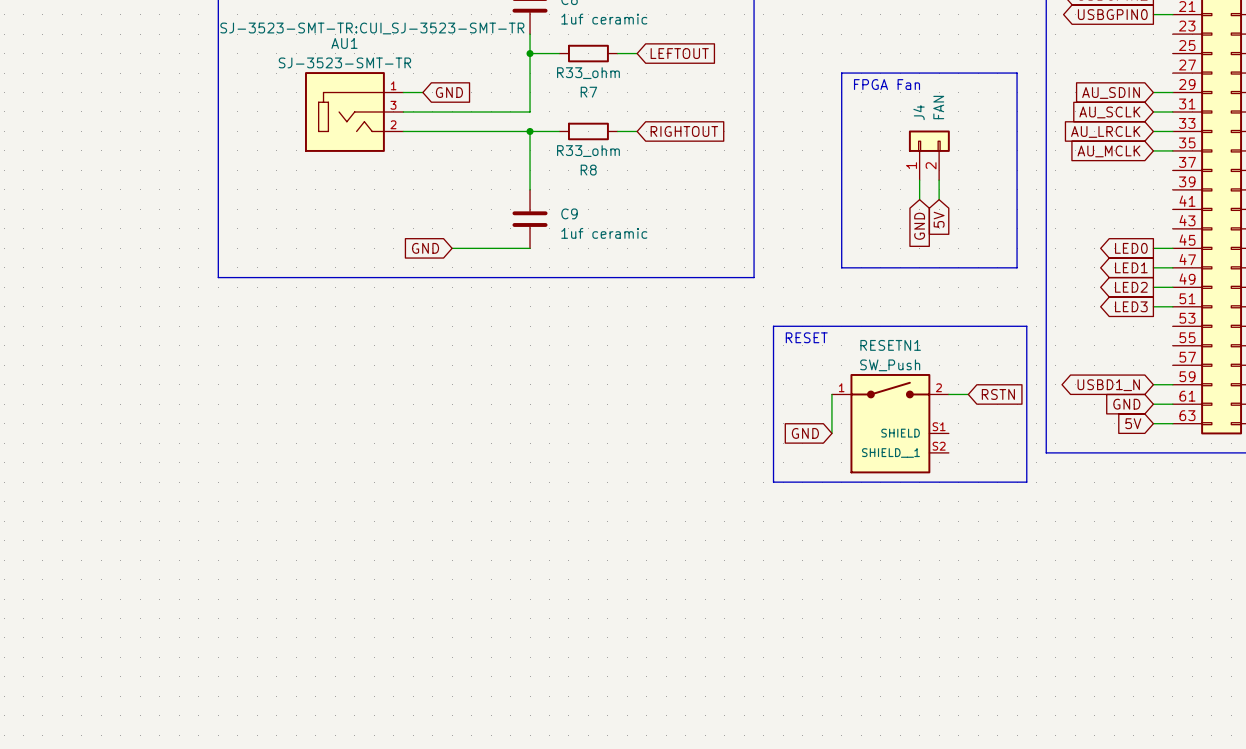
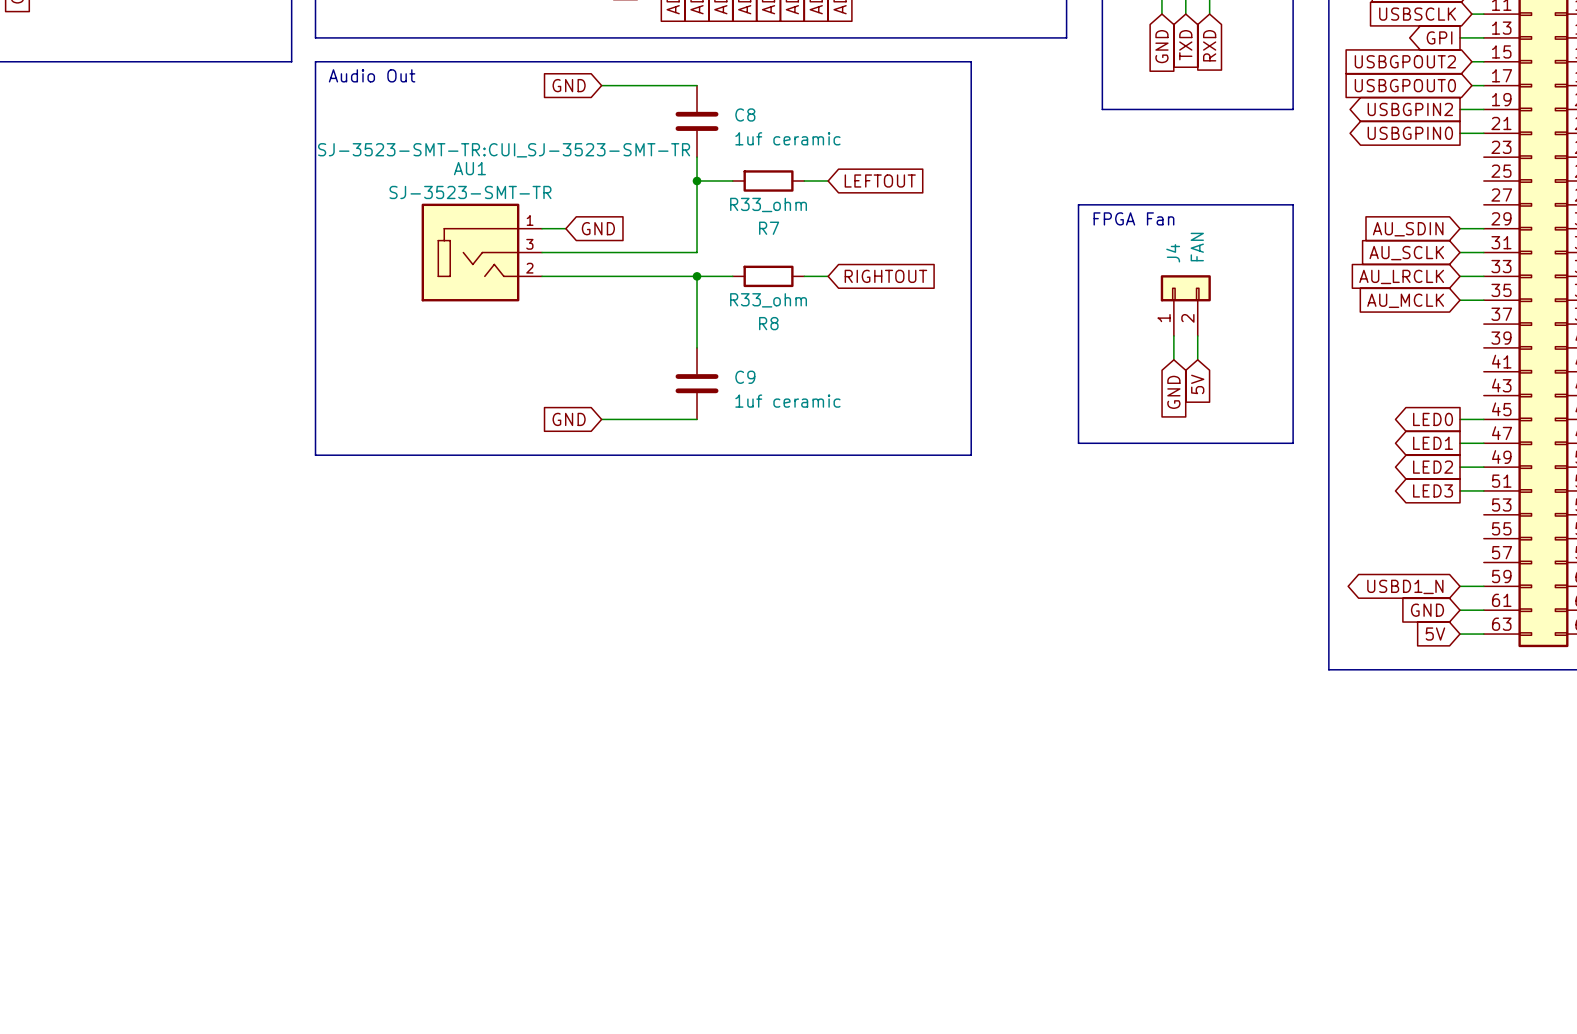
line: (773, 326) (1026, 326) (1026, 482) (773, 482) (773, 326) -> none
text: RESET (806, 337) -> none
wire: (831, 394) (831, 433) -> none
wire: (948, 394) (968, 394) -> none
global label: RSTN (998, 394) -> none
RESETN1: SW_Push (890, 423) -> none
global label: GND (805, 433) -> none

